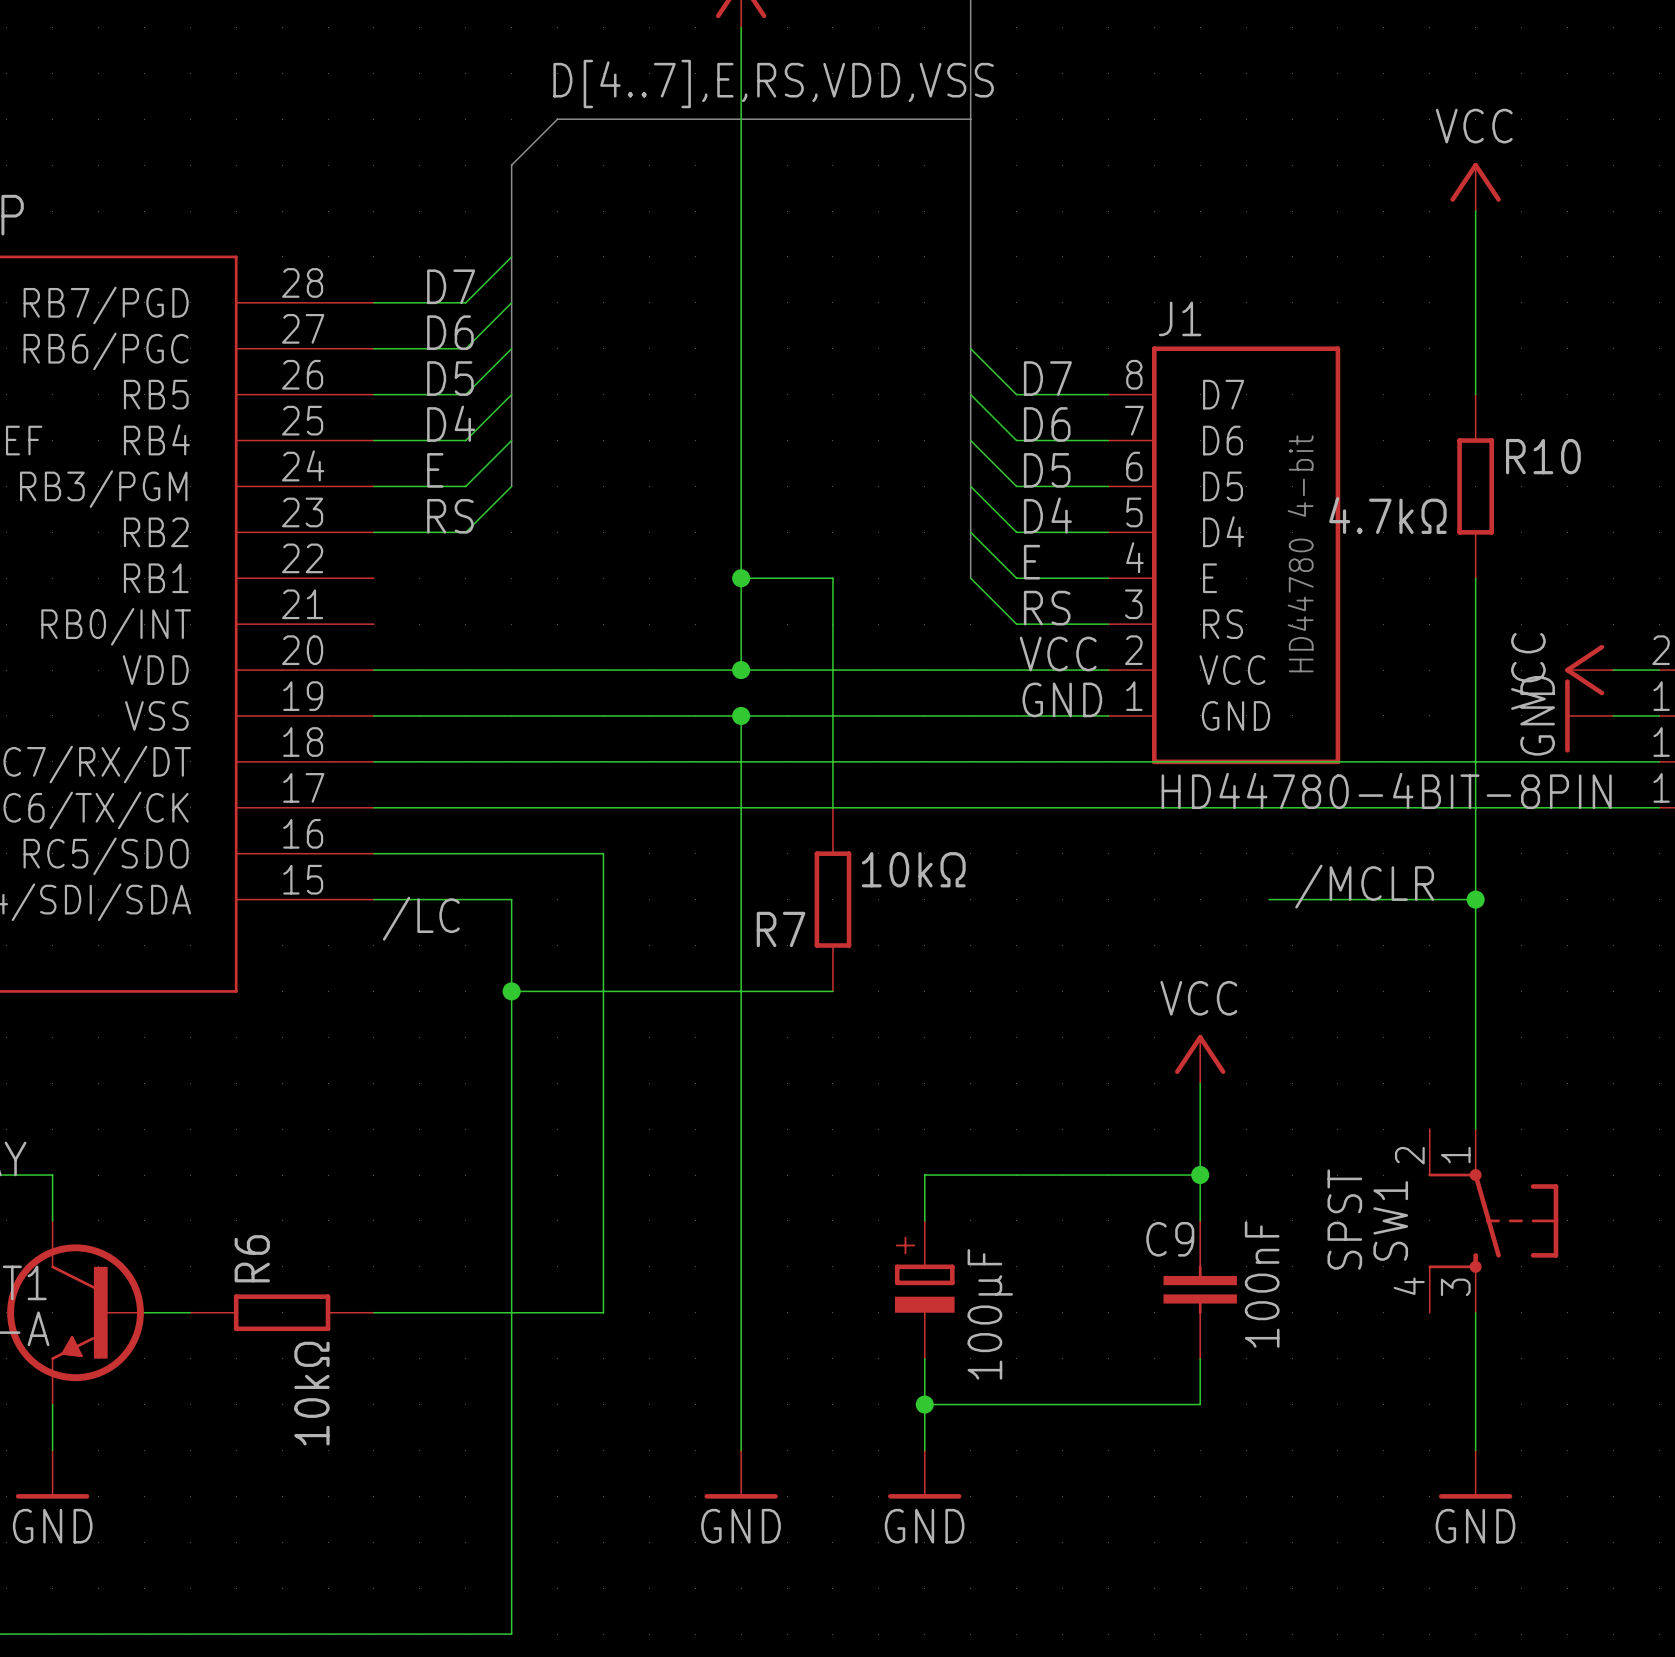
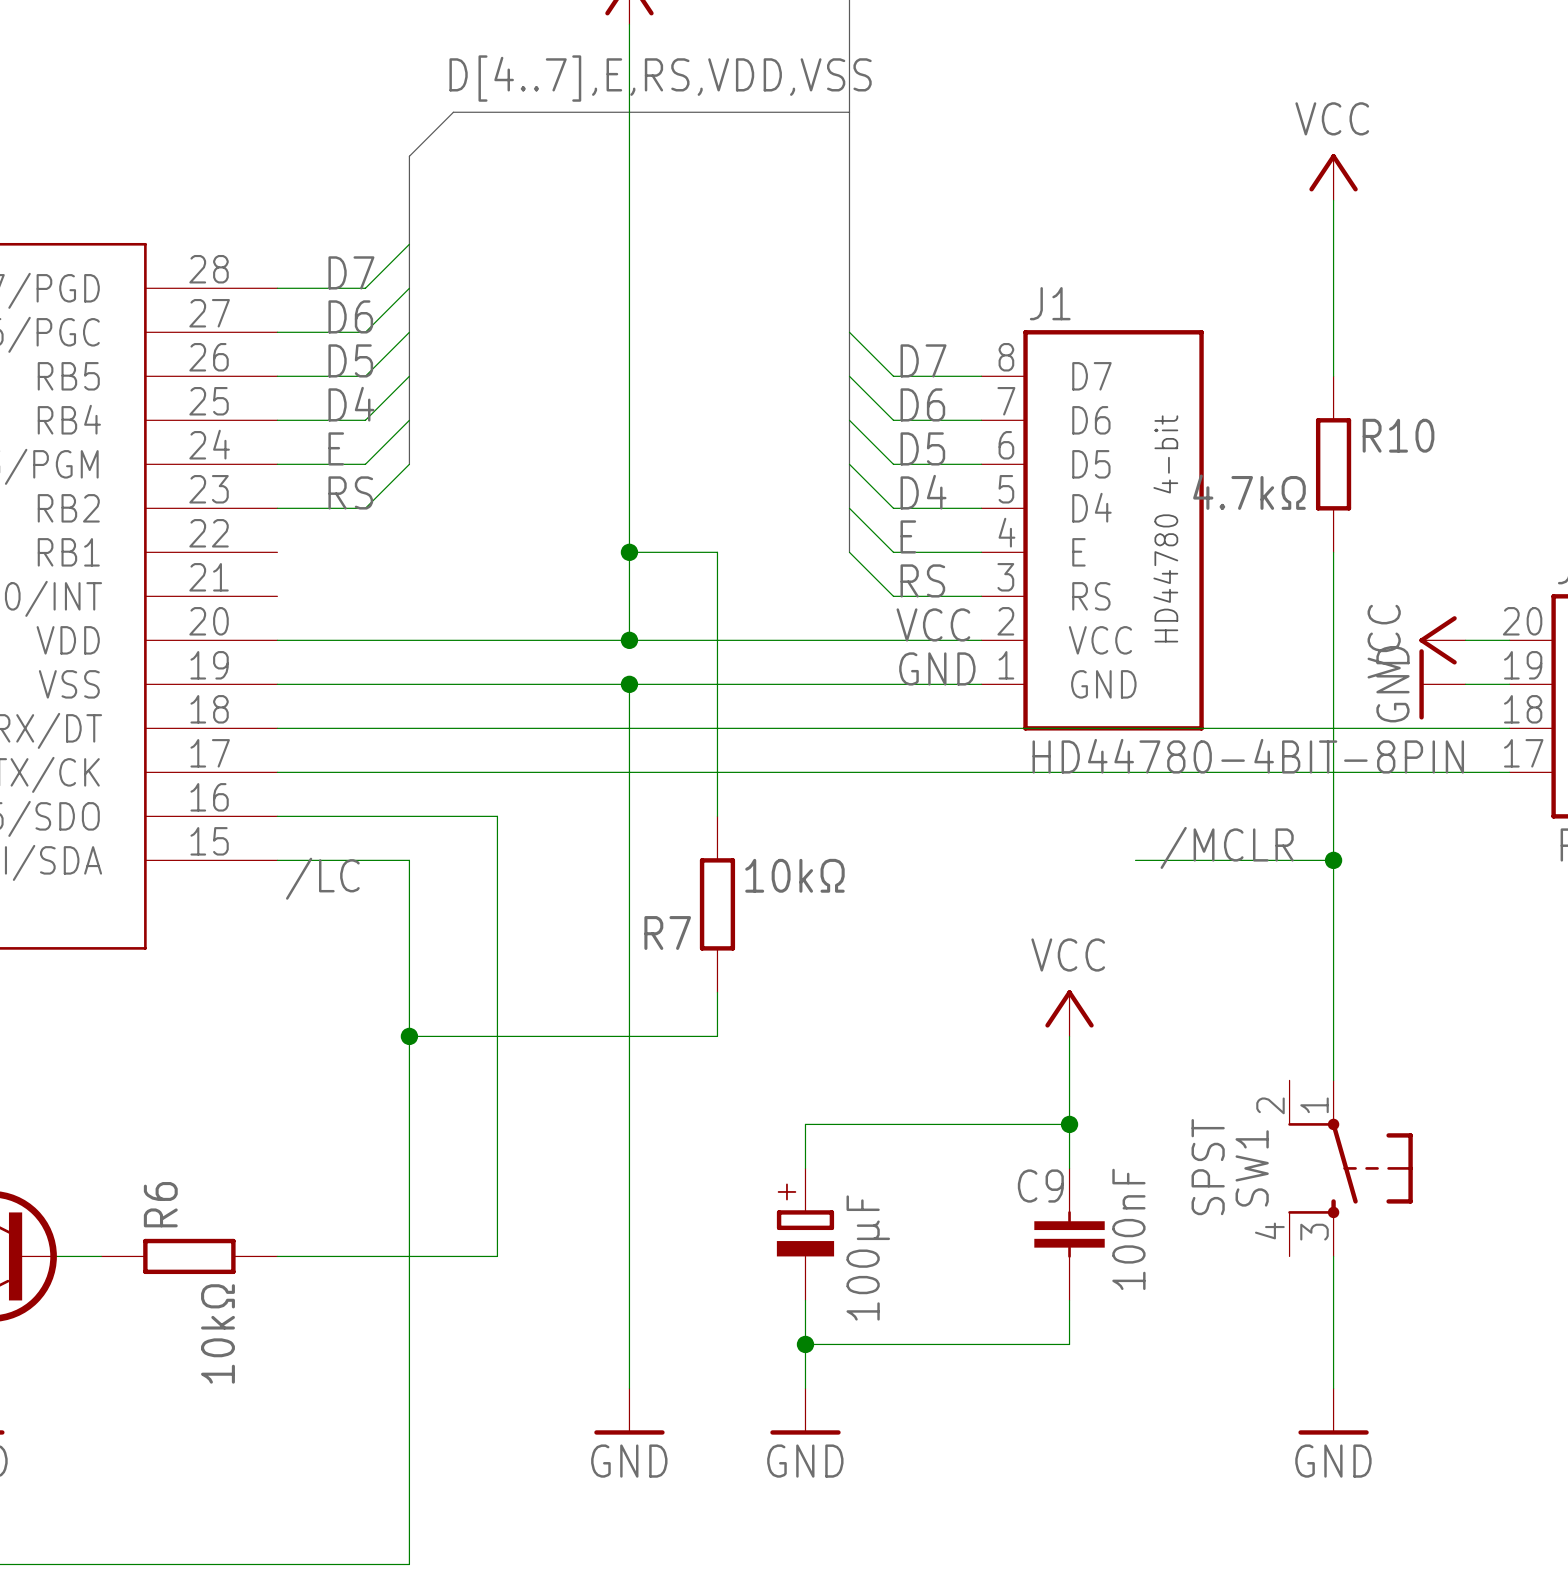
R7 position: (832, 899) -> (717, 904)
wire: (511, 991) (832, 991) -> none
junction position: (511, 991) -> (409, 1036)
wire: none -> (717, 992) (717, 1036) (409, 1036)

